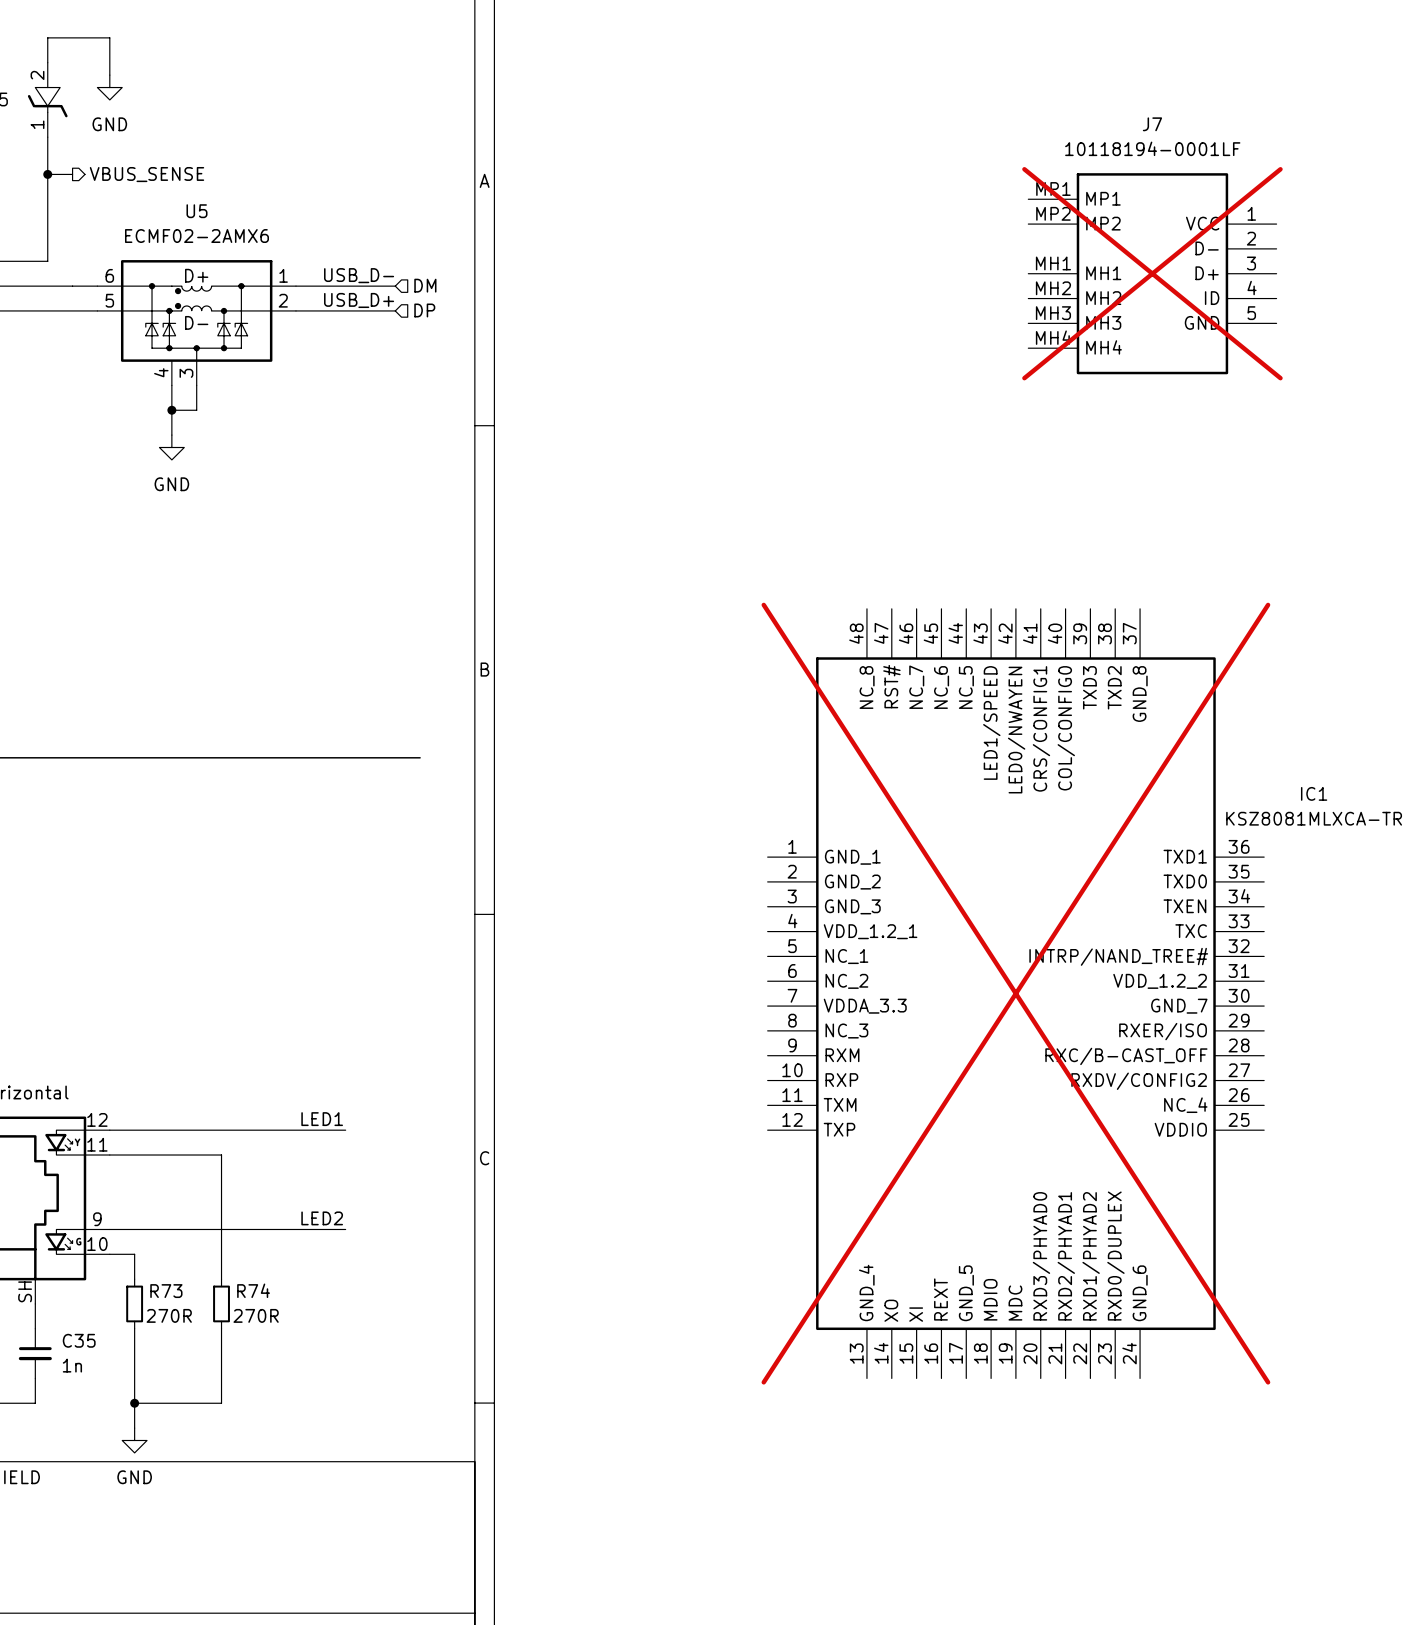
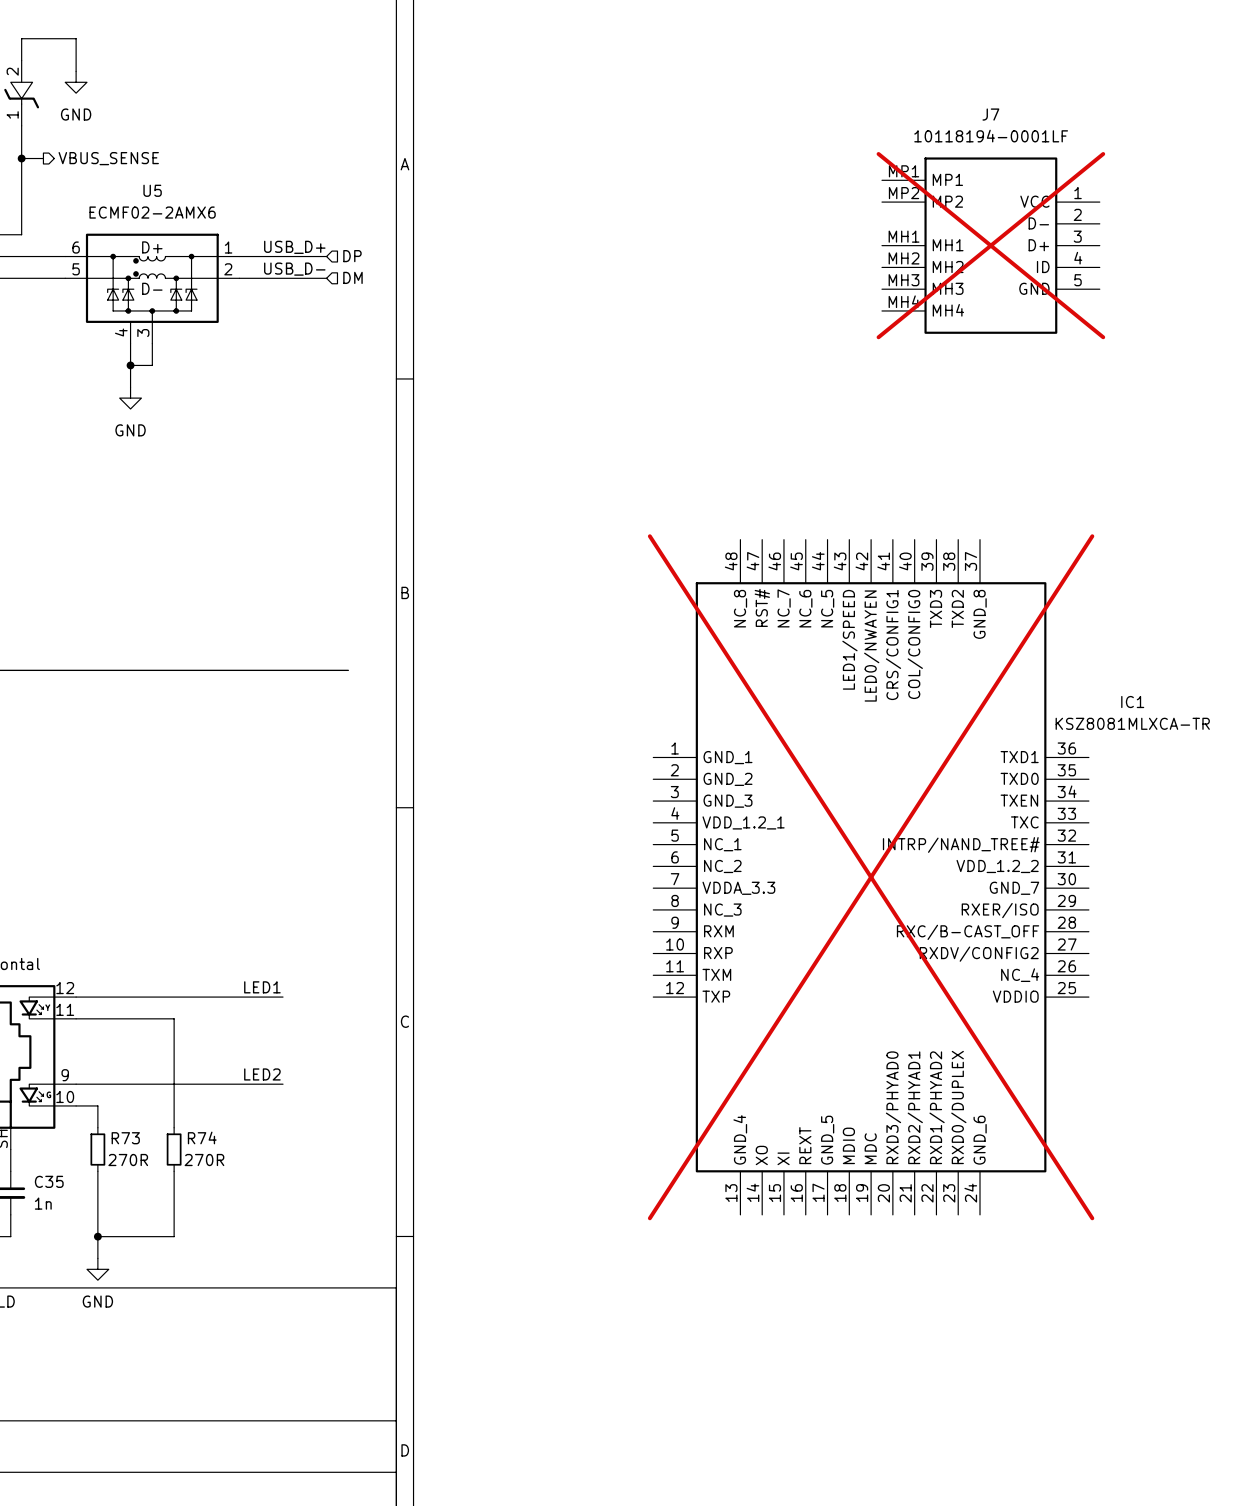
label: USB_D- (359, 275) -> USB_D+ (294, 247)
hierarchical label: DM (425, 285) -> DP (352, 256)
label: USB_D+ (359, 300) -> USB_D- (294, 269)
hierarchical label: DP (424, 310) -> DM (352, 277)

